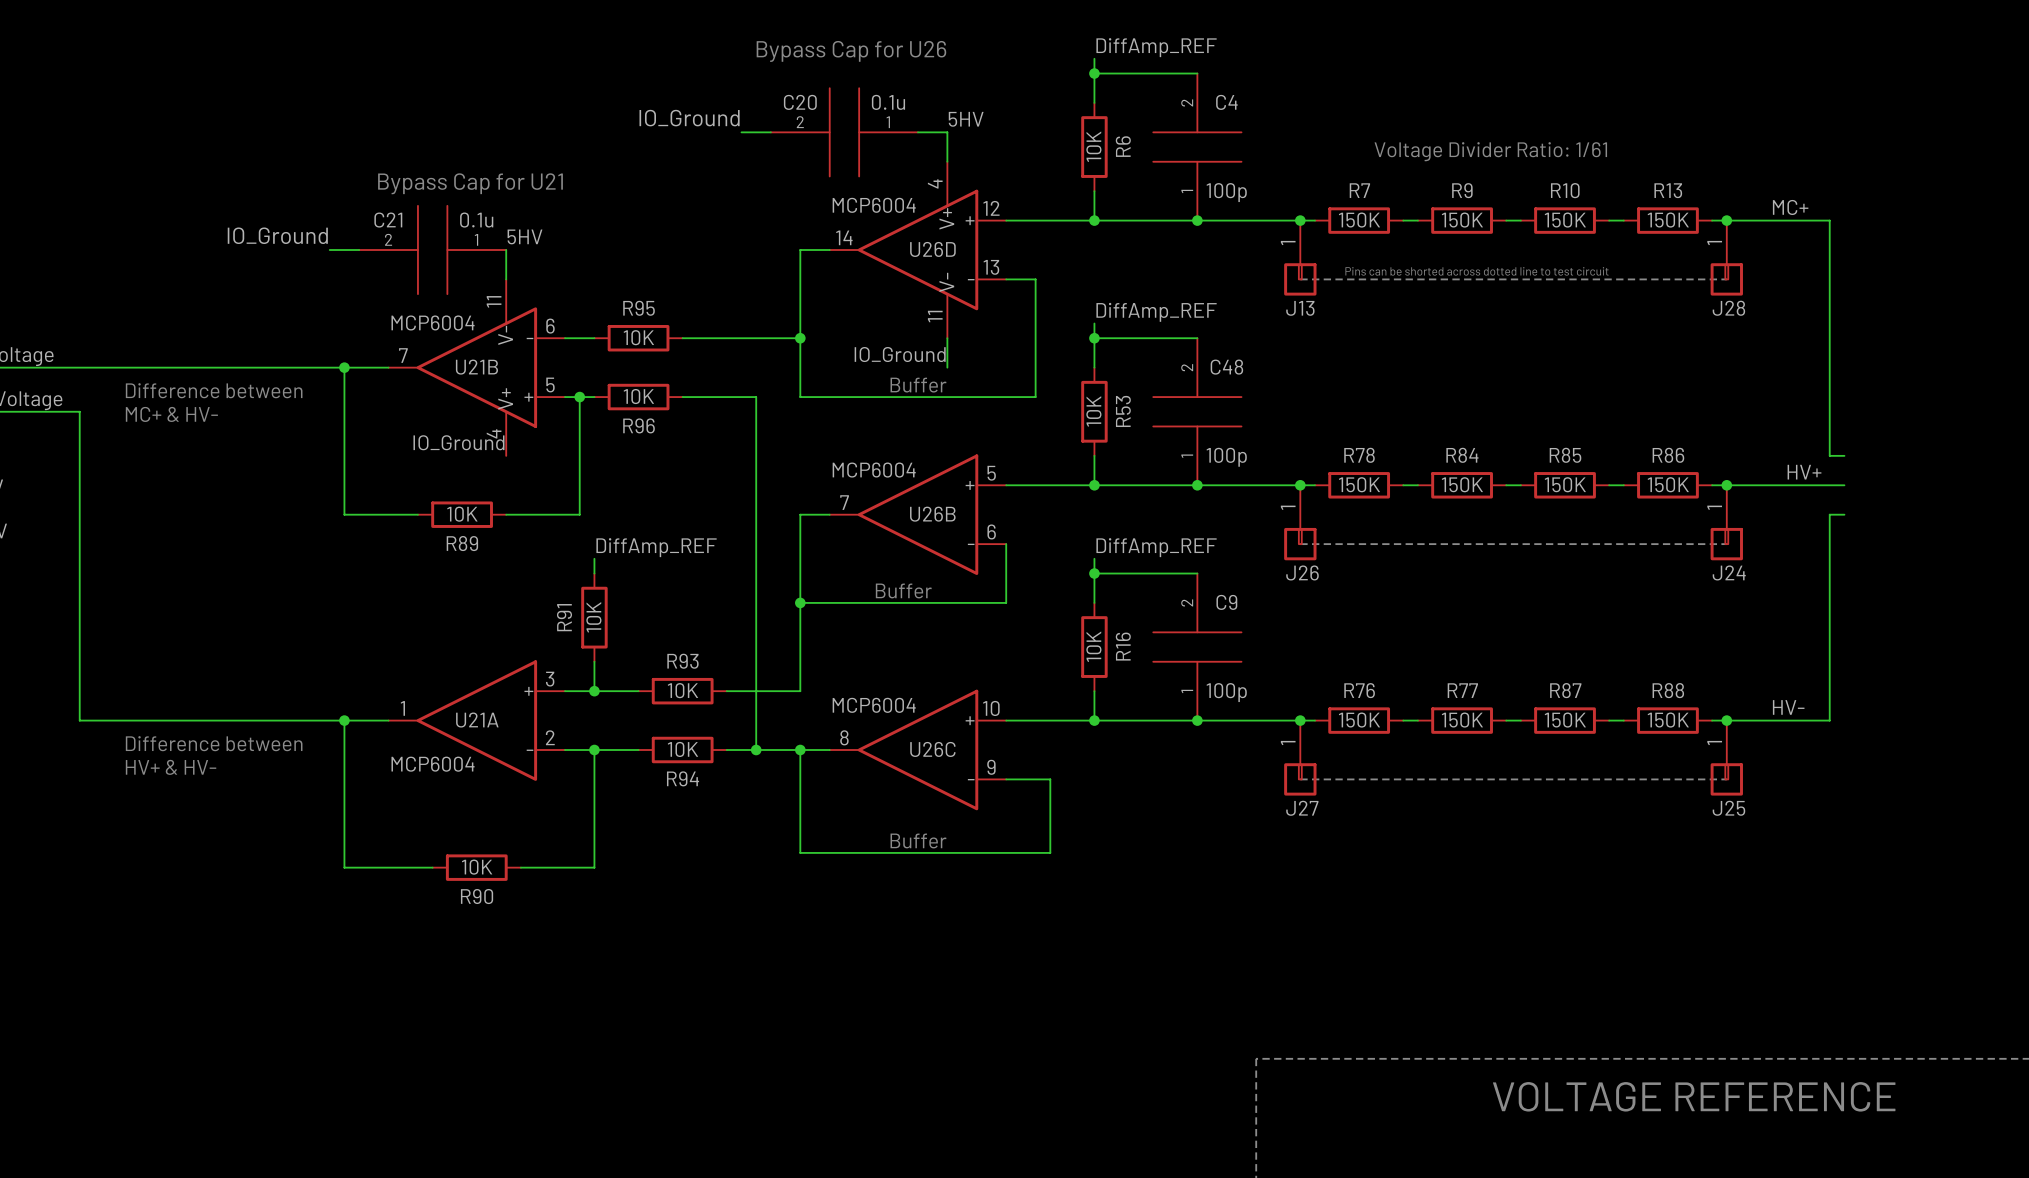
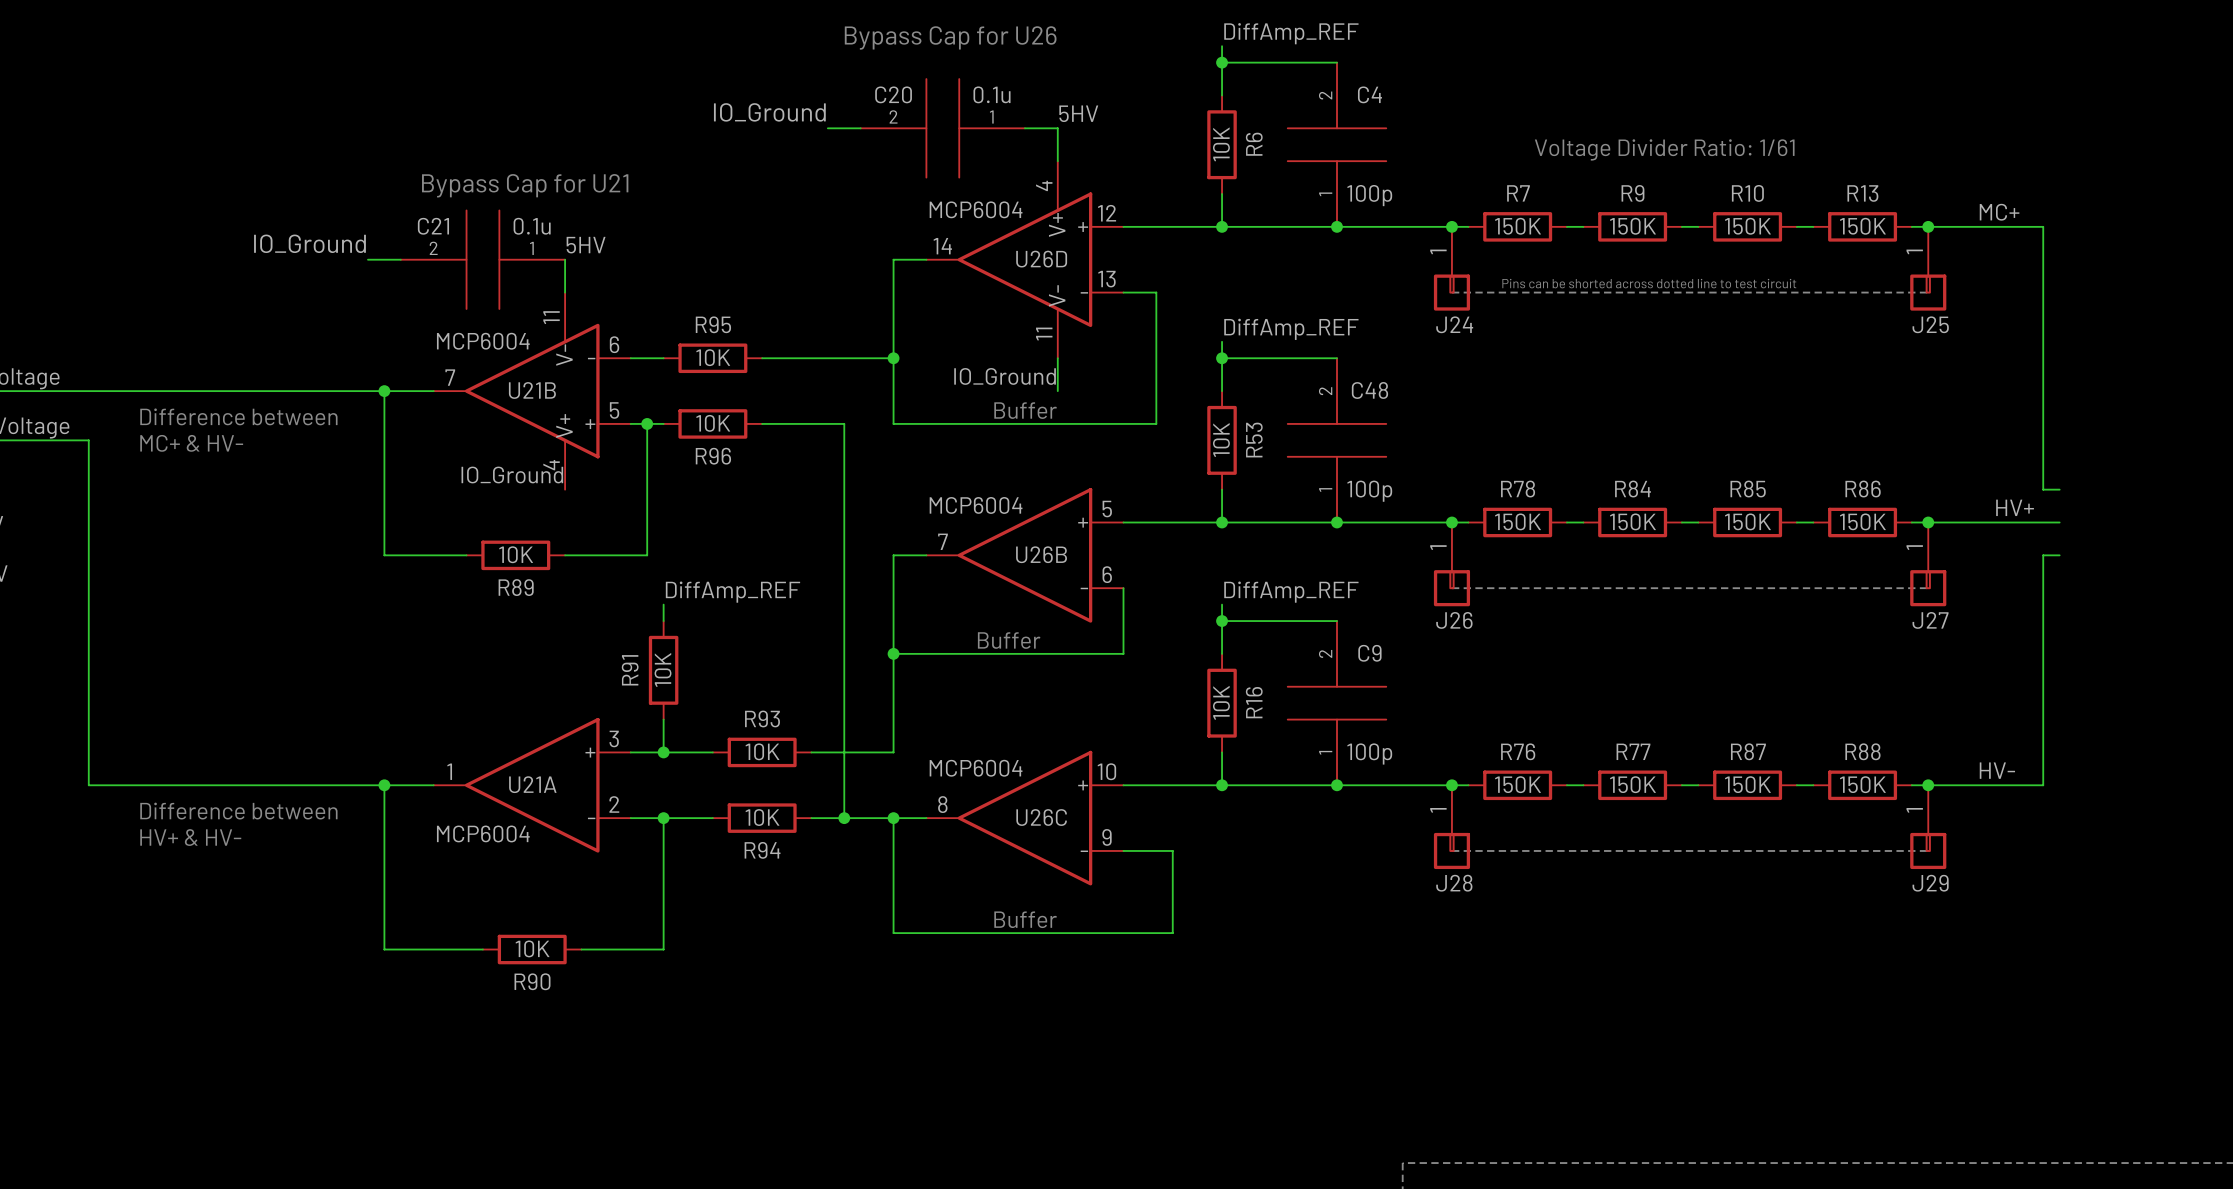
J13 name: J13 (1300, 308) -> J24 (1454, 324)
J28 name: J28 (1728, 308) -> J25 (1930, 324)
J24 name: J24 (1729, 572) -> J27 (1930, 620)
J27 name: J27 (1302, 808) -> J28 (1454, 883)
J25 name: J25 (1728, 808) -> J29 (1930, 883)

